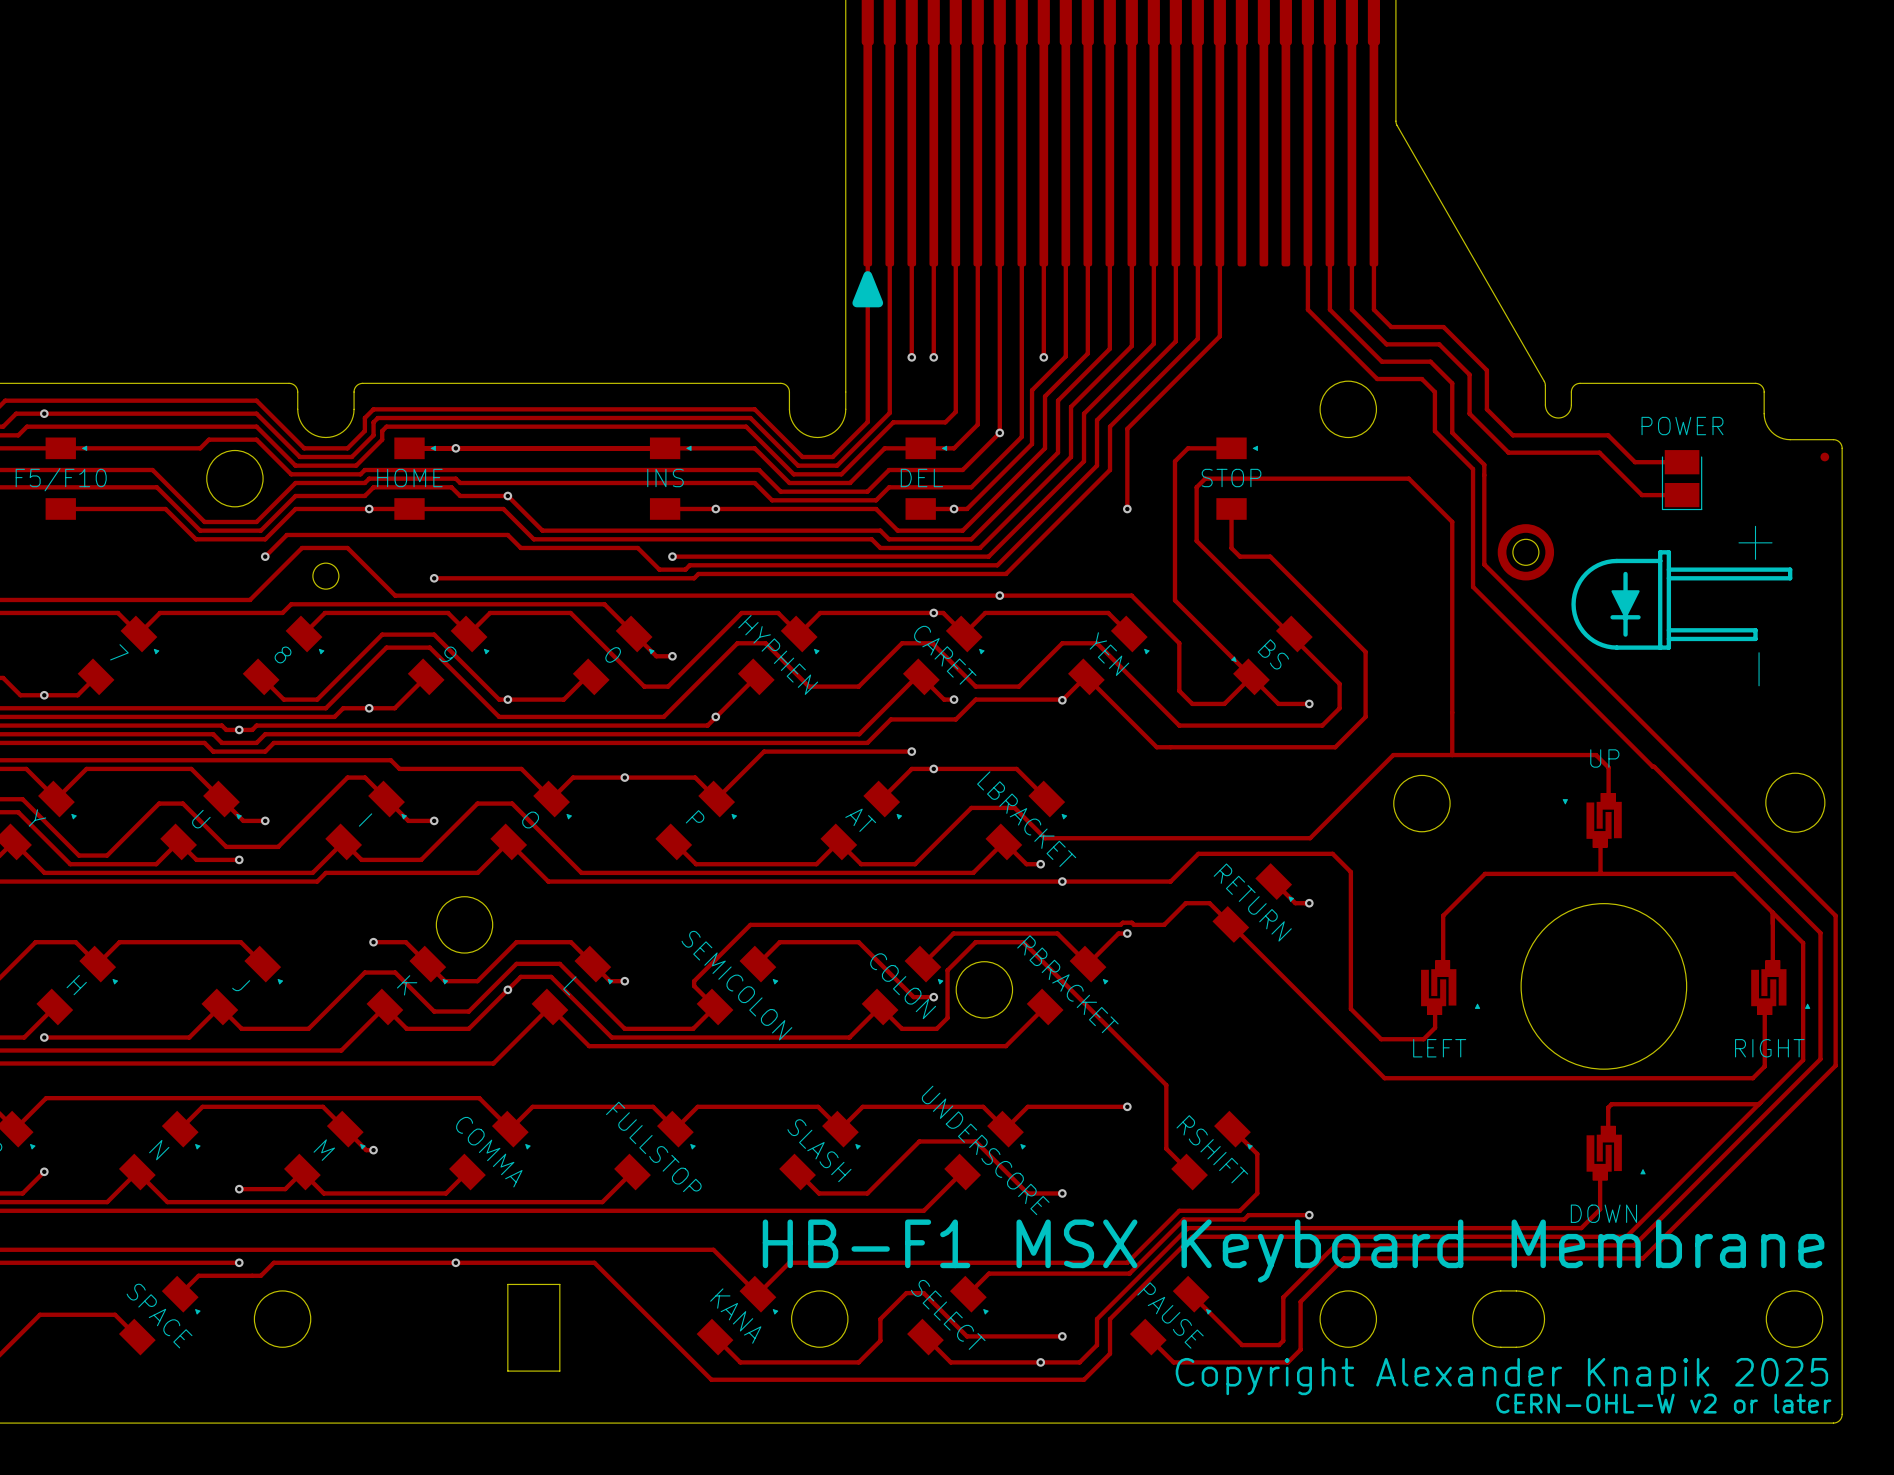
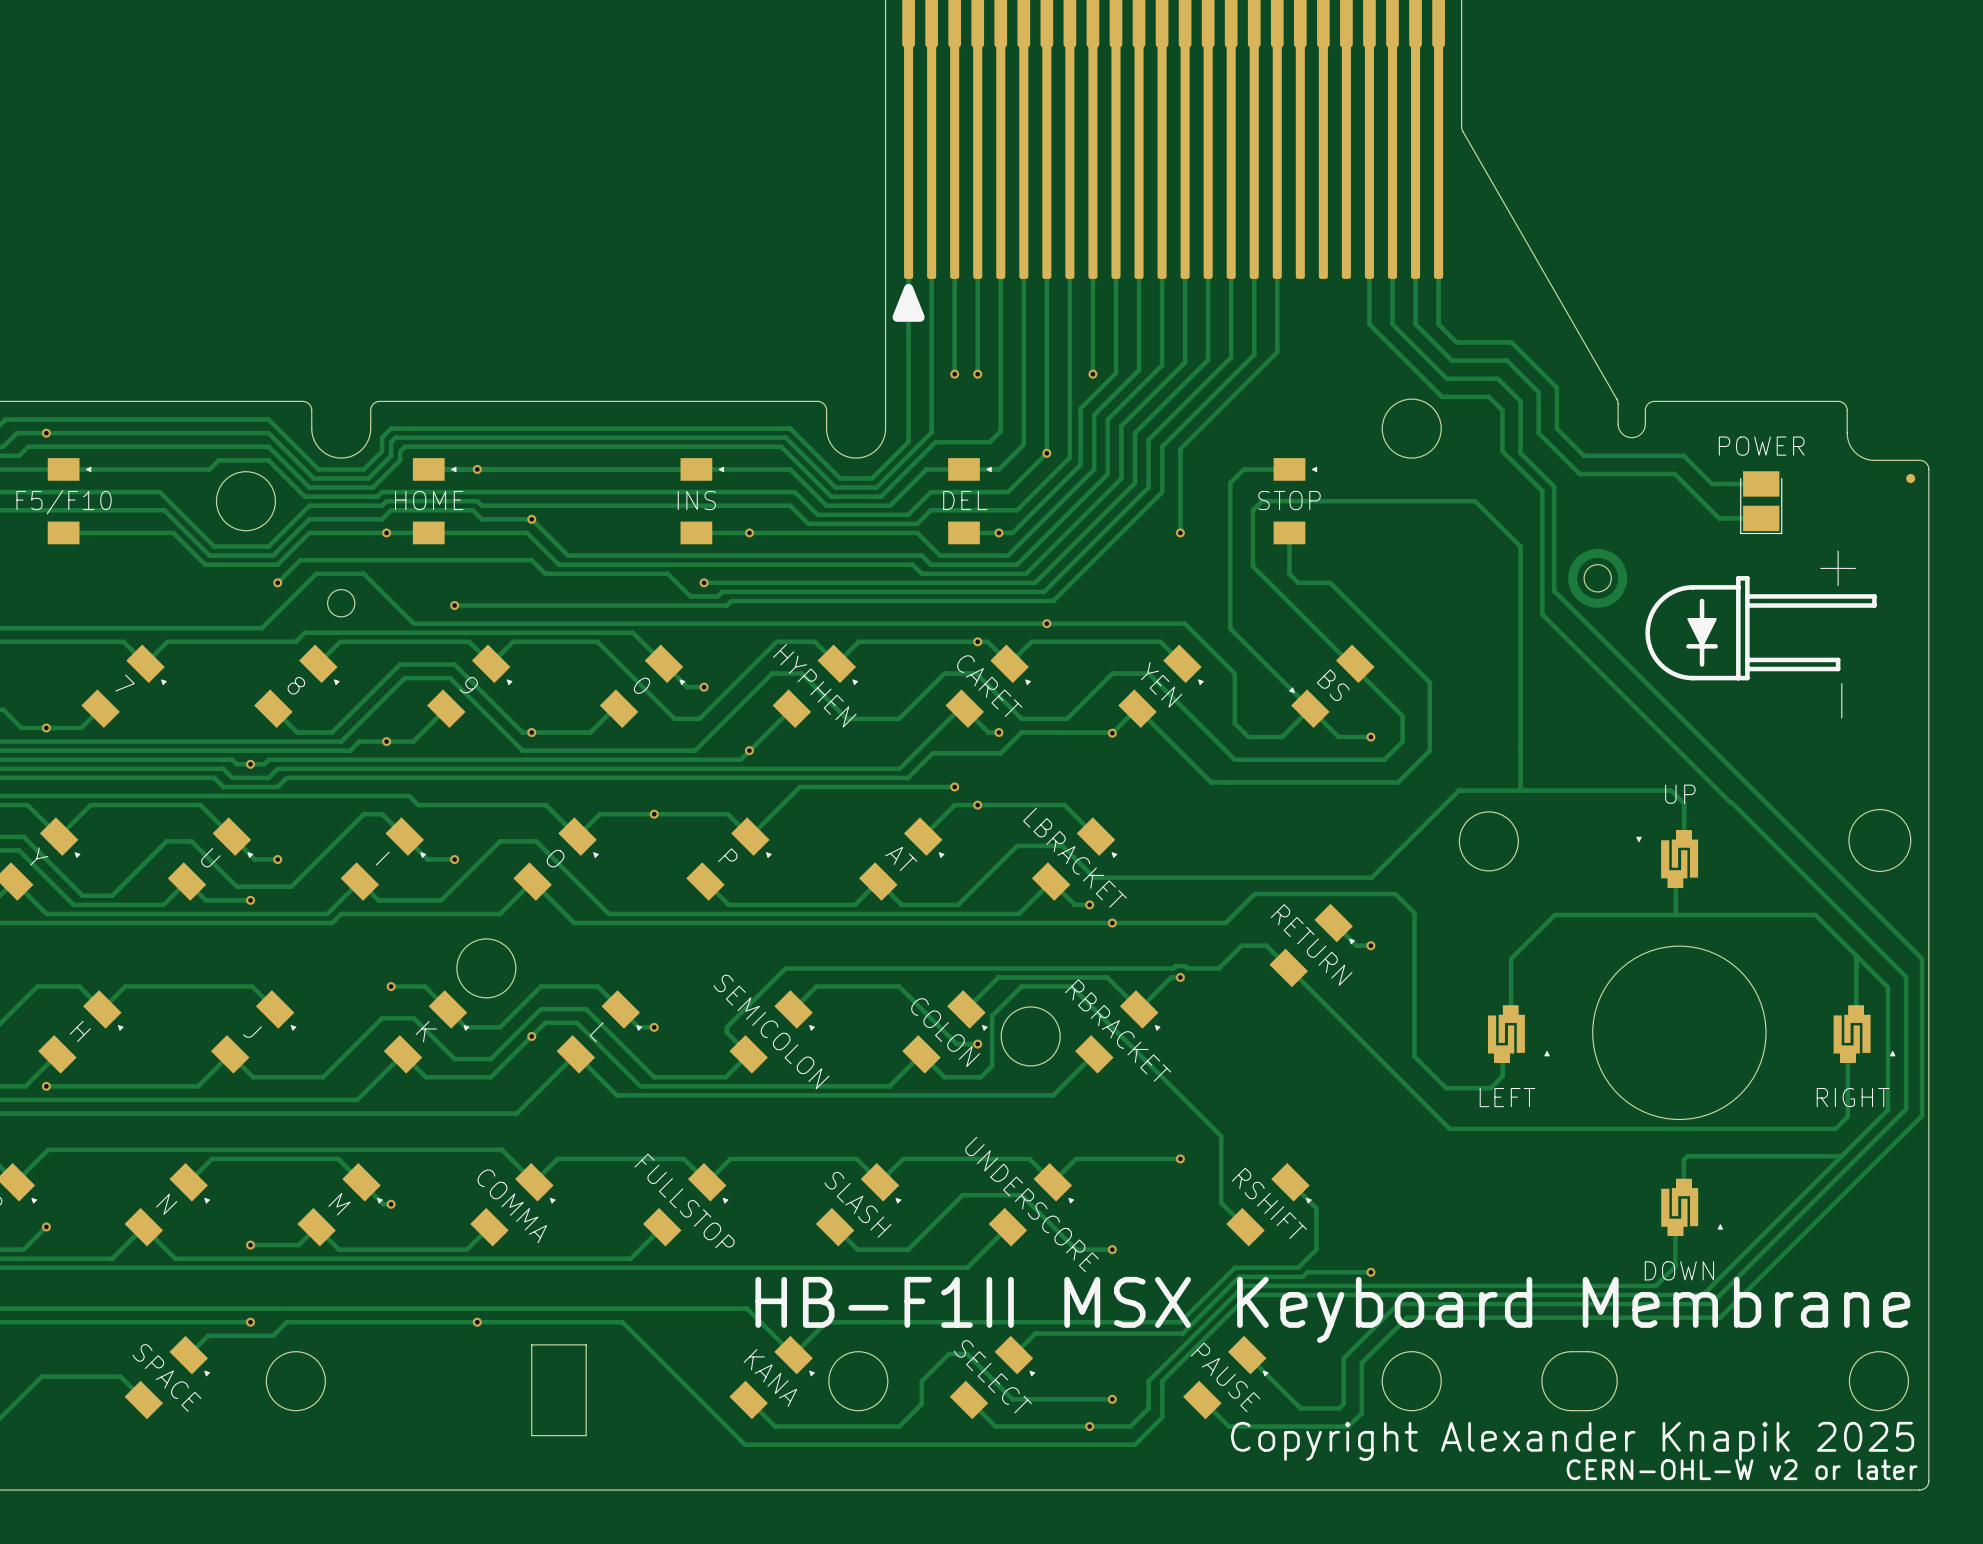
text: HB-F1 MSX Keyboard Membrane (1293, 1251) -> HB-F1II MSX Keyboard Membrane (1332, 1309)

